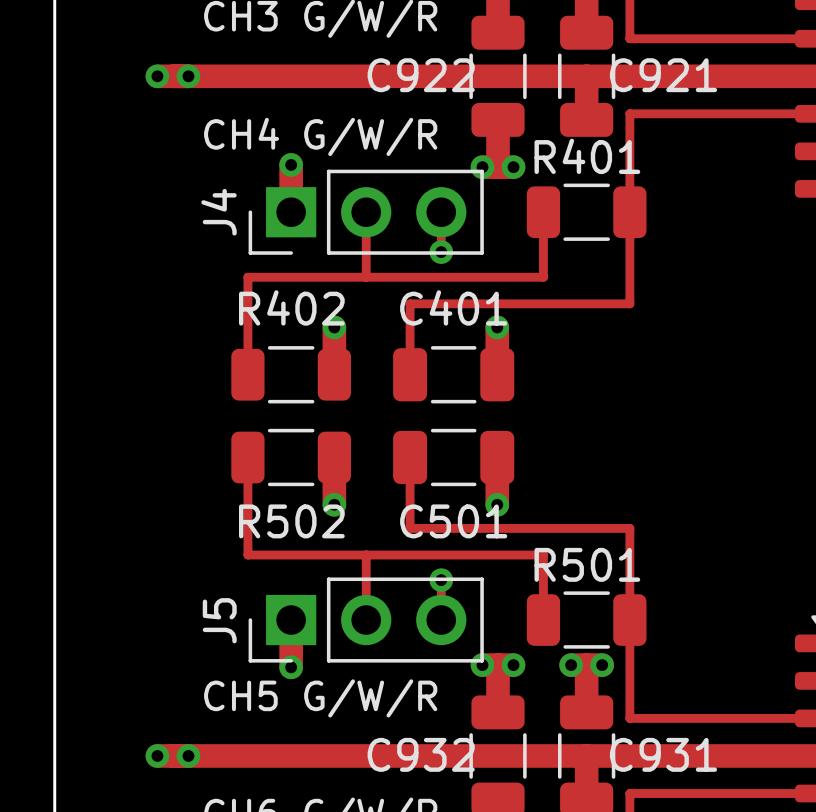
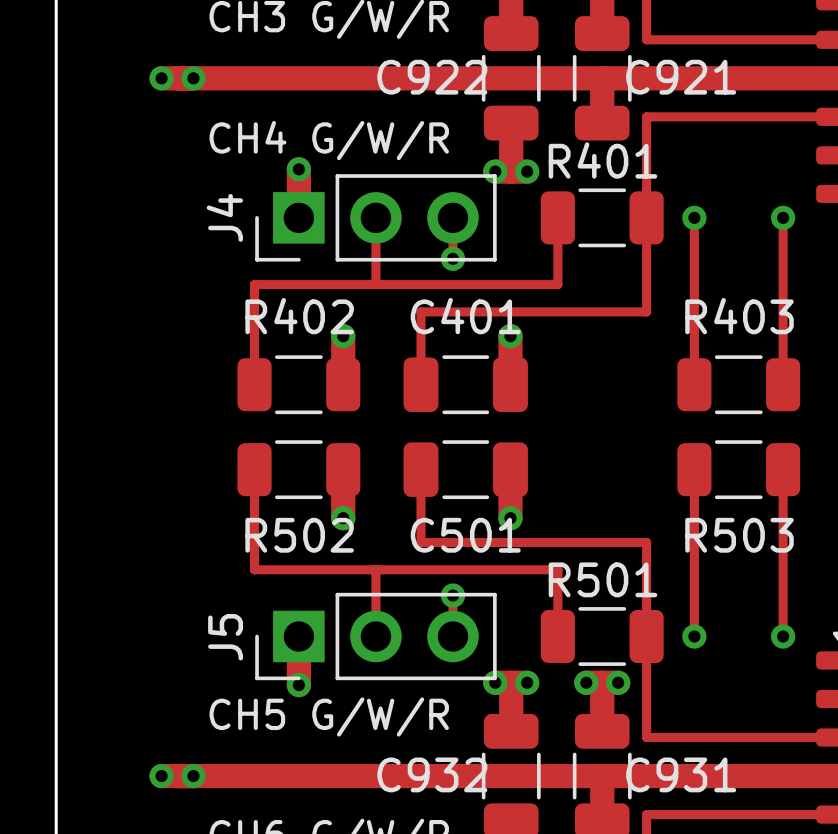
track: none -> (694, 217) (694, 384)
via: none -> (694, 217)
track: none -> (783, 217) (783, 384)
via: none -> (783, 217)
R403: none -> (738, 384)
track: none -> (694, 469) (694, 636)
R503: none -> (738, 469)
track: none -> (783, 469) (783, 636)
via: none -> (694, 636)
via: none -> (783, 636)

